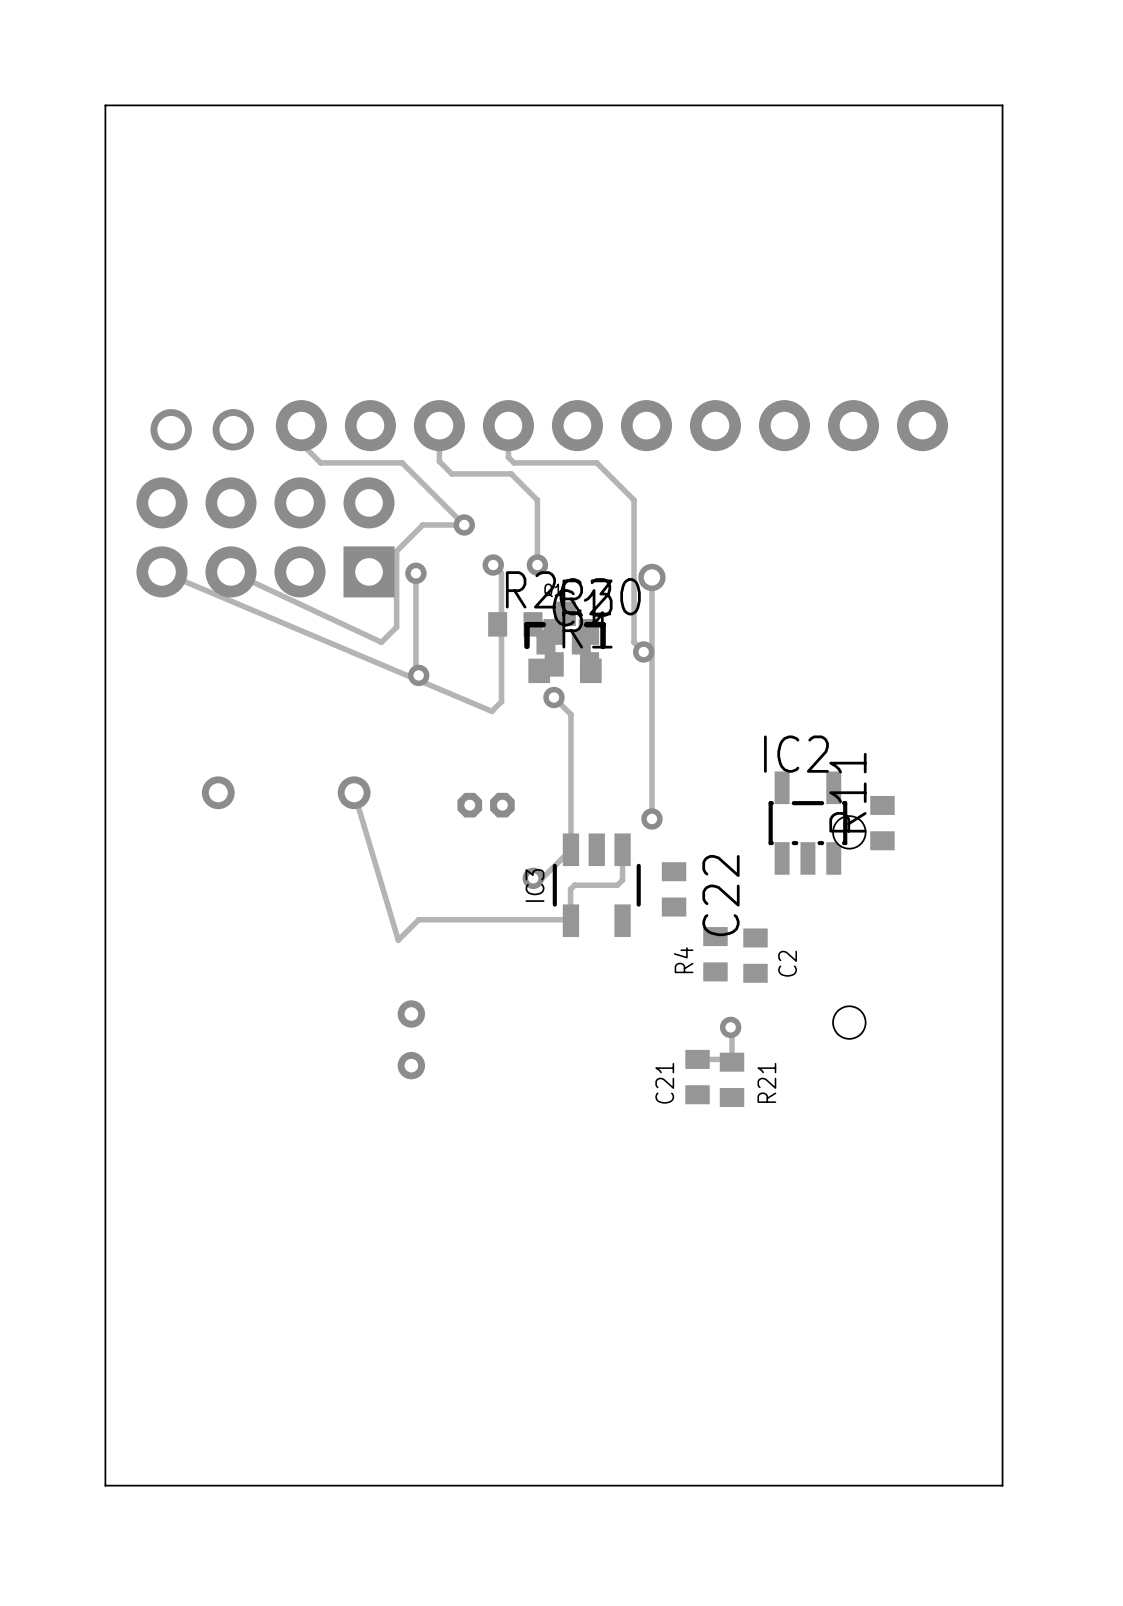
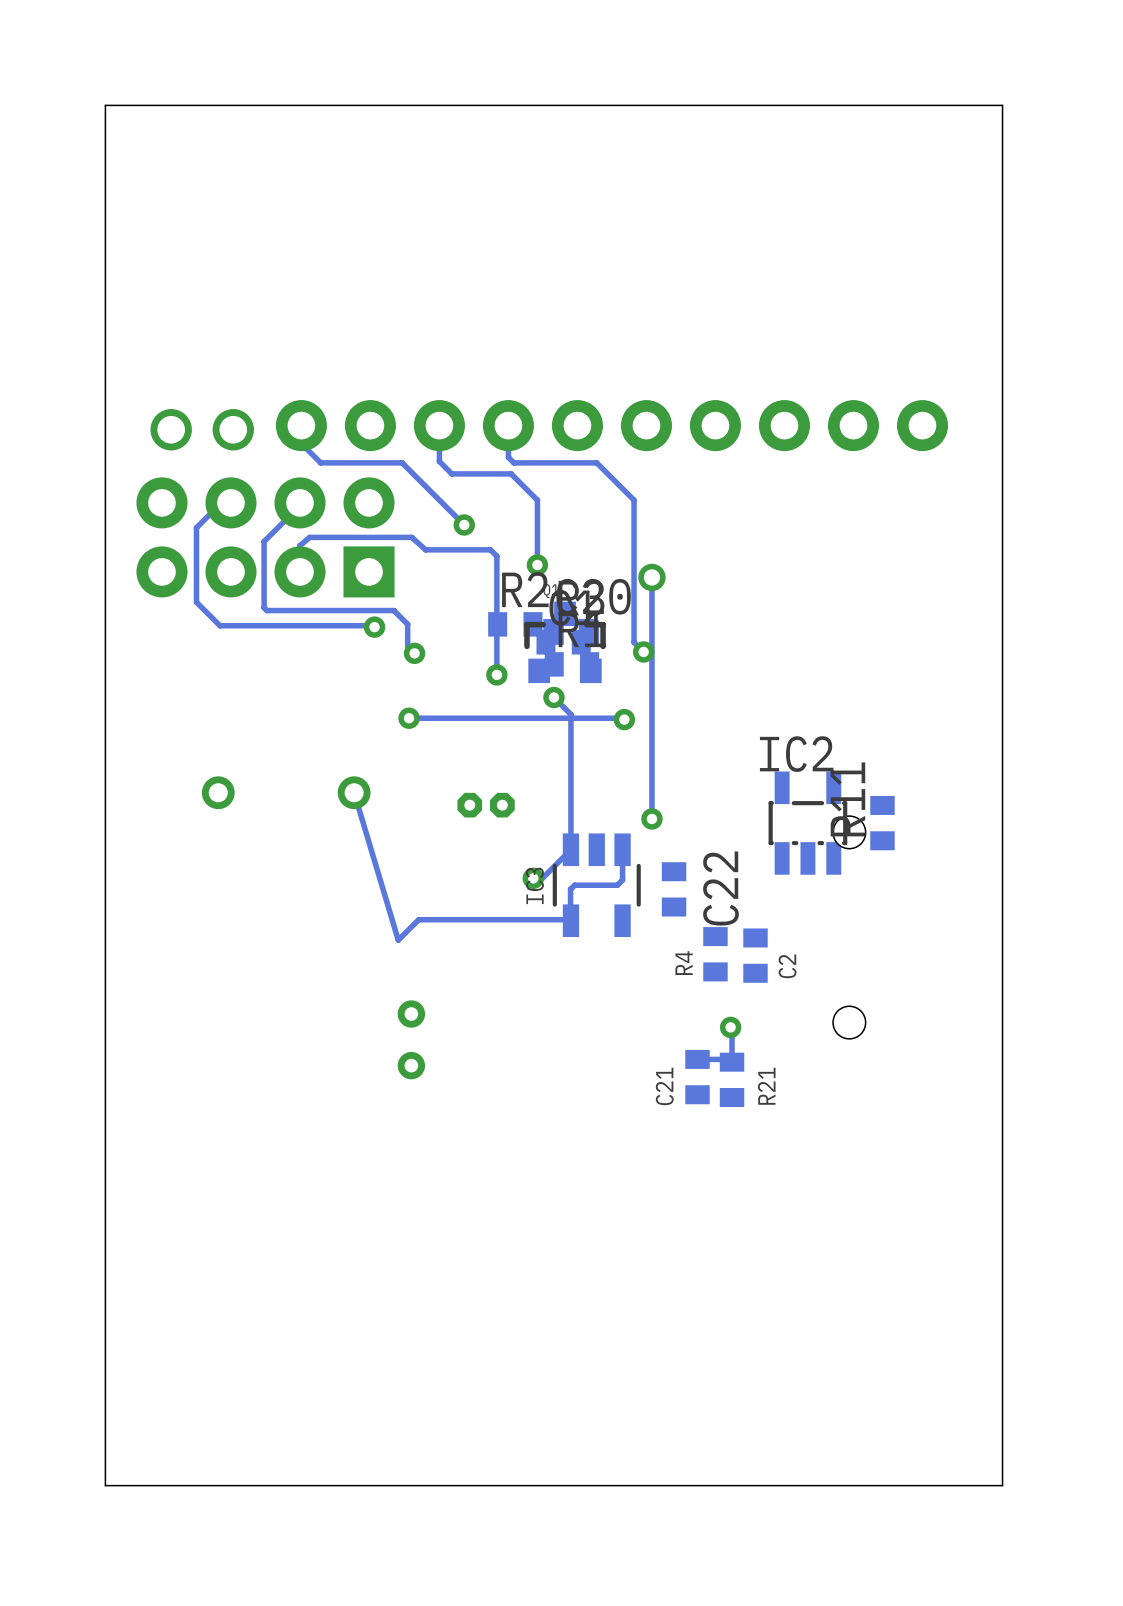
track: none -> (231, 502) (221, 502) (196, 527) (196, 602) (219, 625) (374, 627)
track: none -> (300, 502) (300, 505) (264, 541) (264, 607) (266, 610) (393, 610) (407, 624) (407, 646) (414, 653)
track: (464, 524) (422, 524) (396, 551) (396, 627) (381, 642) (231, 571) -> none
track: (493, 565) (501, 573) (501, 701) (491, 711) (161, 571) -> none
via: (493, 565) -> none
track: none -> (300, 571) (300, 545) (309, 537) (411, 537) (425, 549) (490, 549) (496, 556) (496, 674)
track: (415, 573) (415, 672) (418, 675) -> none
via: (415, 573) -> none
via: none -> (374, 627)
via: none -> (414, 653)
via: none -> (496, 674)
via: (418, 675) -> none
track: none -> (409, 718) (624, 719)
via: none -> (409, 718)
via: none -> (624, 719)

